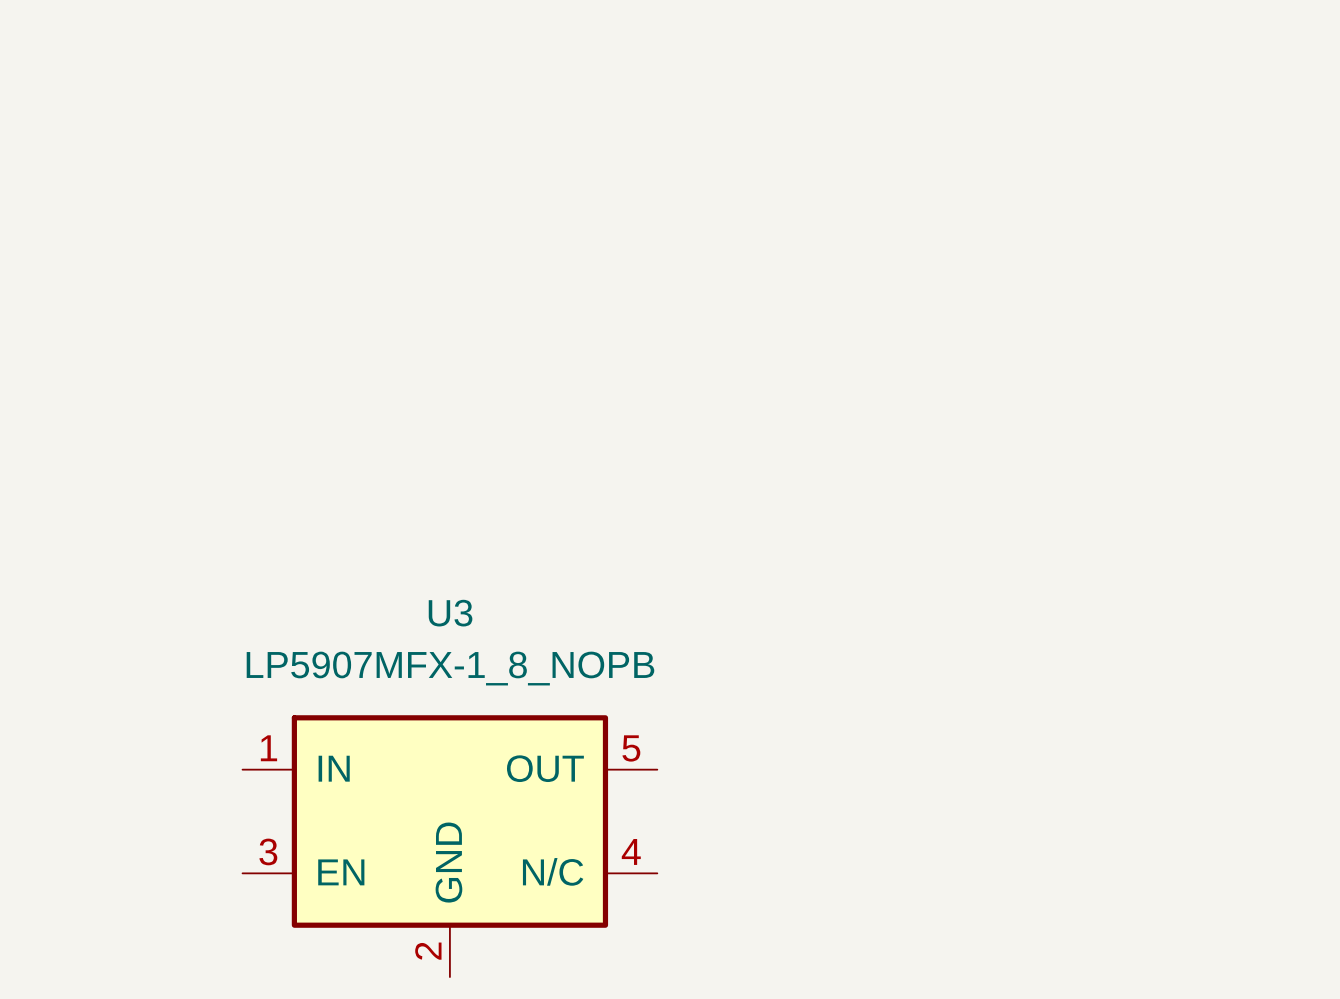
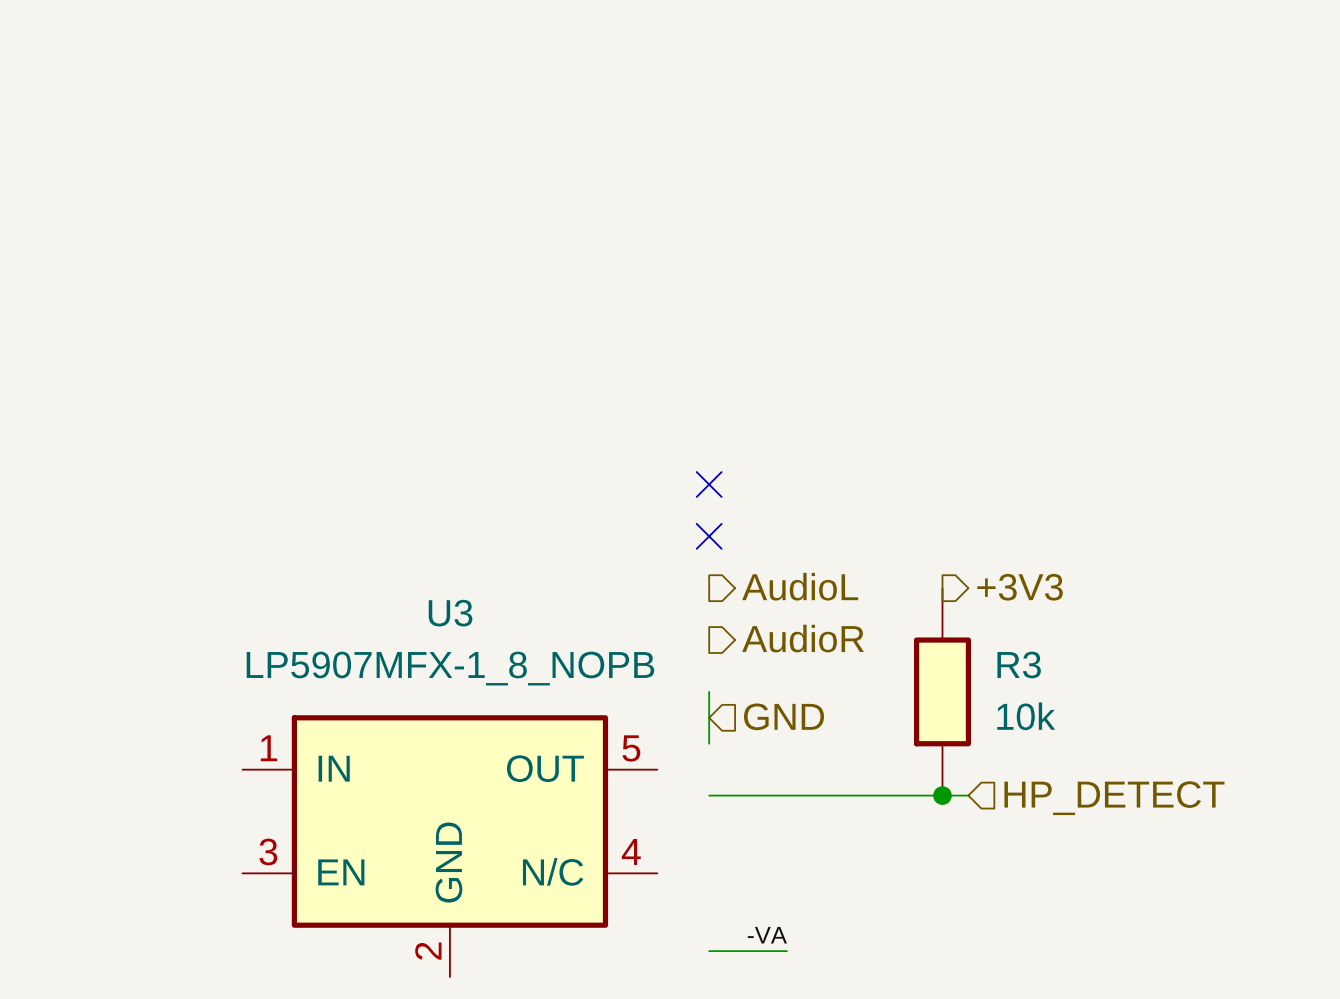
no-connect mark: none -> (709, 484)
no-connect mark: none -> (709, 536)
hierarchical label: none -> AudioL (800, 586)
hierarchical label: none -> +3V3 (1020, 587)
hierarchical label: none -> AudioR (803, 638)
wire: none -> (709, 691) (709, 743)
R3: none -> 10k (942, 691)
hierarchical label: none -> GND (784, 716)
wire: none -> (709, 795) (968, 795)
junction: none -> (942, 795)
hierarchical label: none -> HP_DETECT (1114, 798)
label: none -> -VA (767, 935)
wire: none -> (709, 951) (786, 951)

